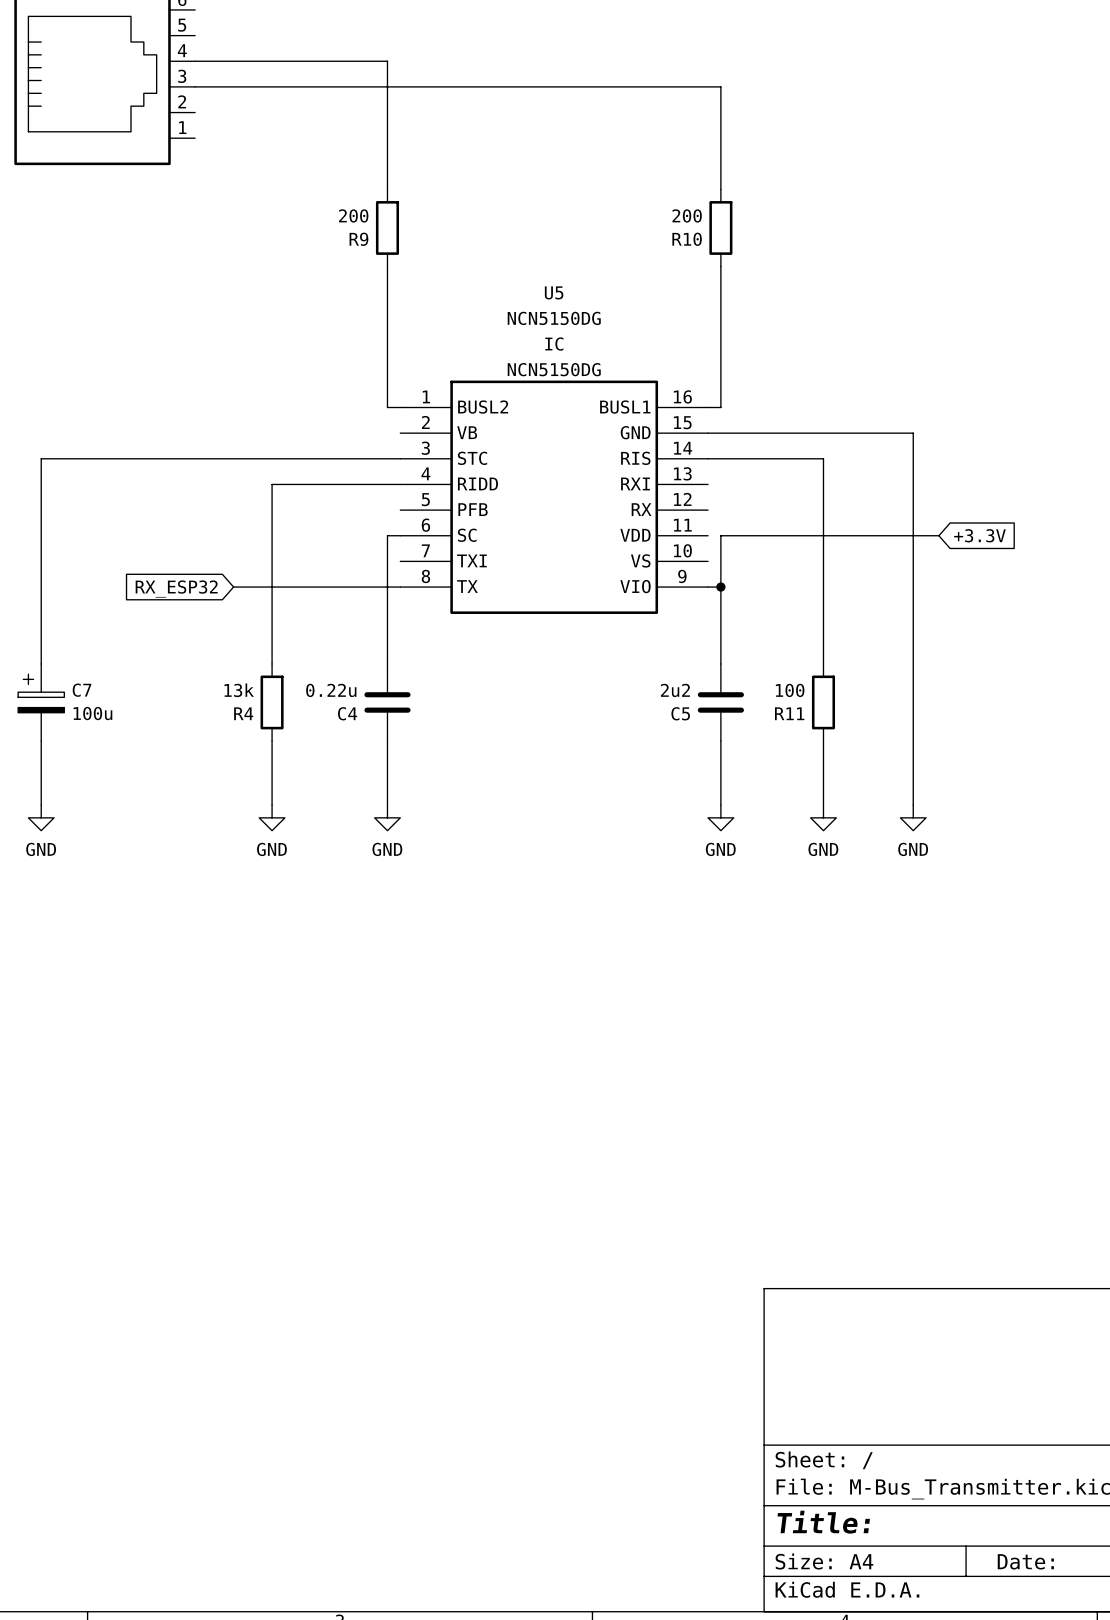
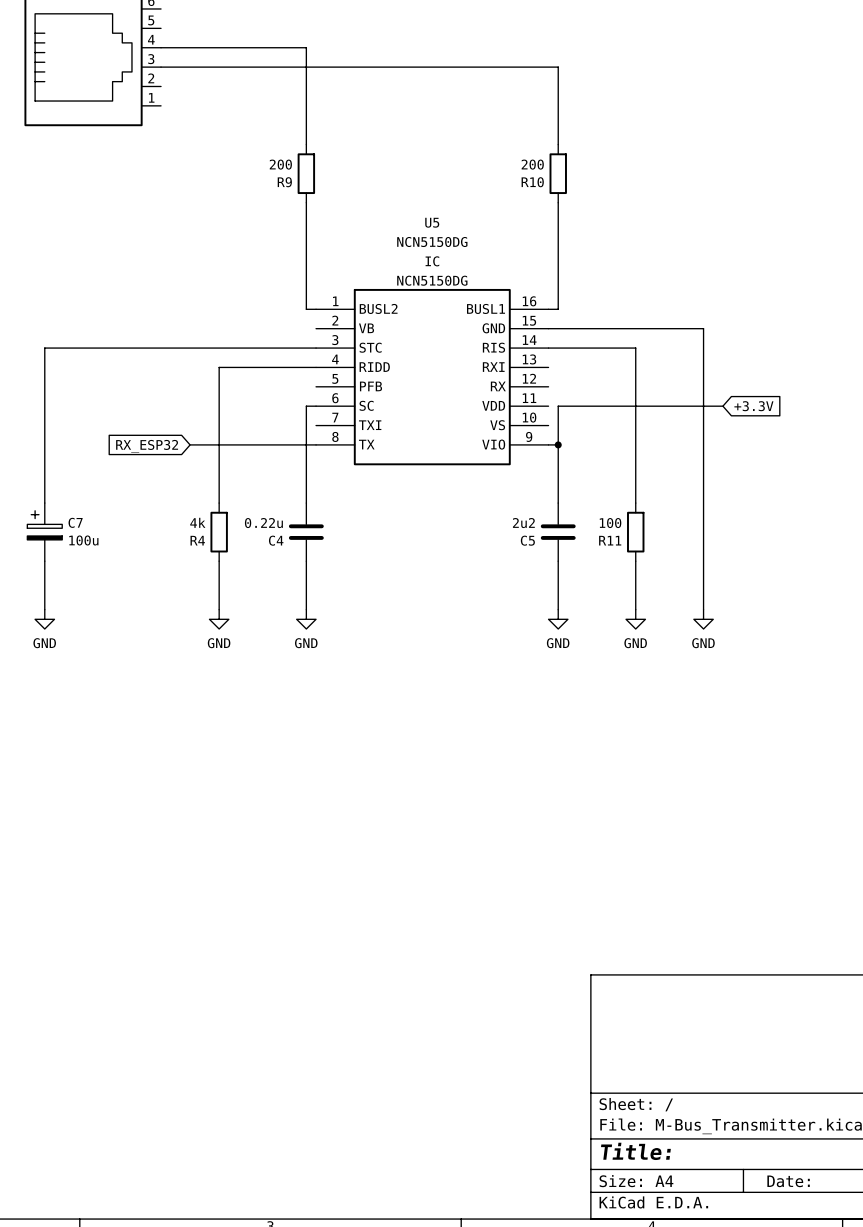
R4 value: 13k (239, 690) -> 4k (197, 522)

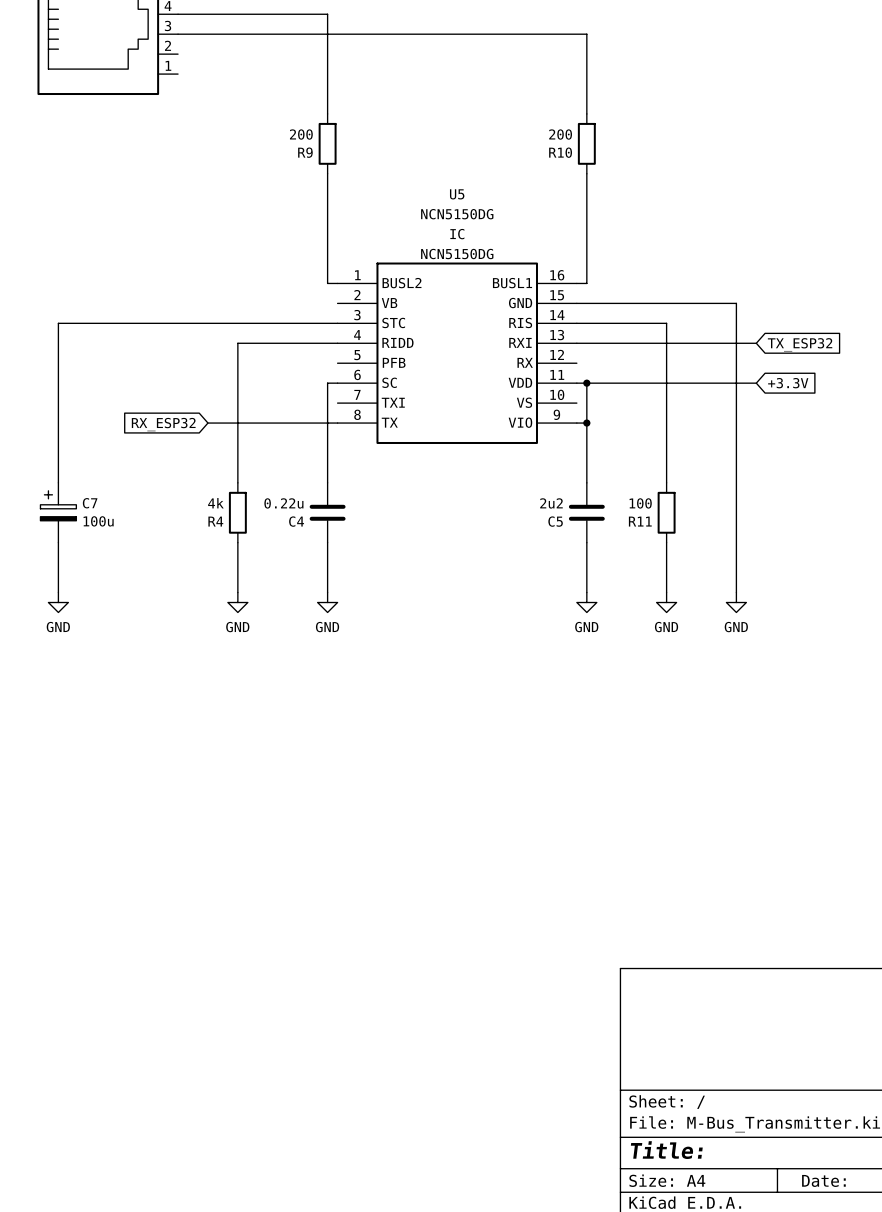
wire: none -> (576, 343) (756, 343)
global label: none -> TX_ESP32 (800, 344)
wire: none -> (576, 383) (586, 383)
junction: none -> (586, 383)

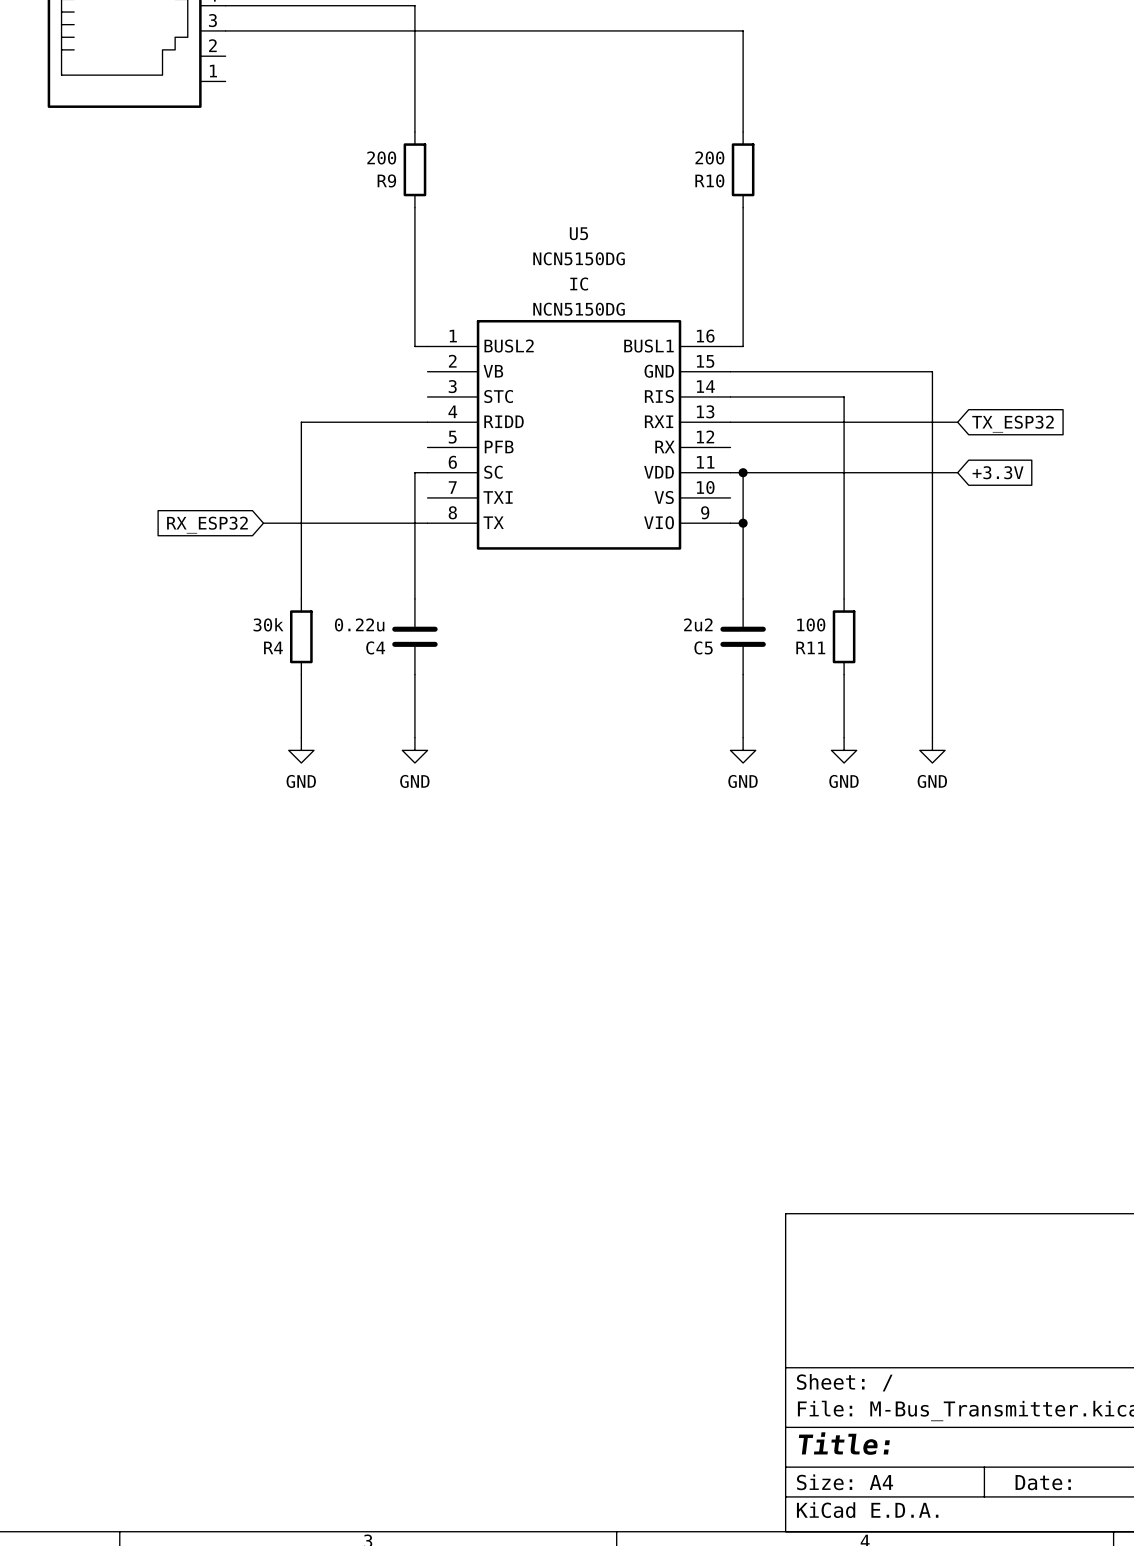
wire: (337, 323) (58, 323) (58, 482) -> none
R4 value: 4k (215, 503) -> 30k (268, 624)
C7: 100u (58, 512) -> none
wire: (58, 542) (58, 592) -> none
power symbol: GND (58, 602) -> none

